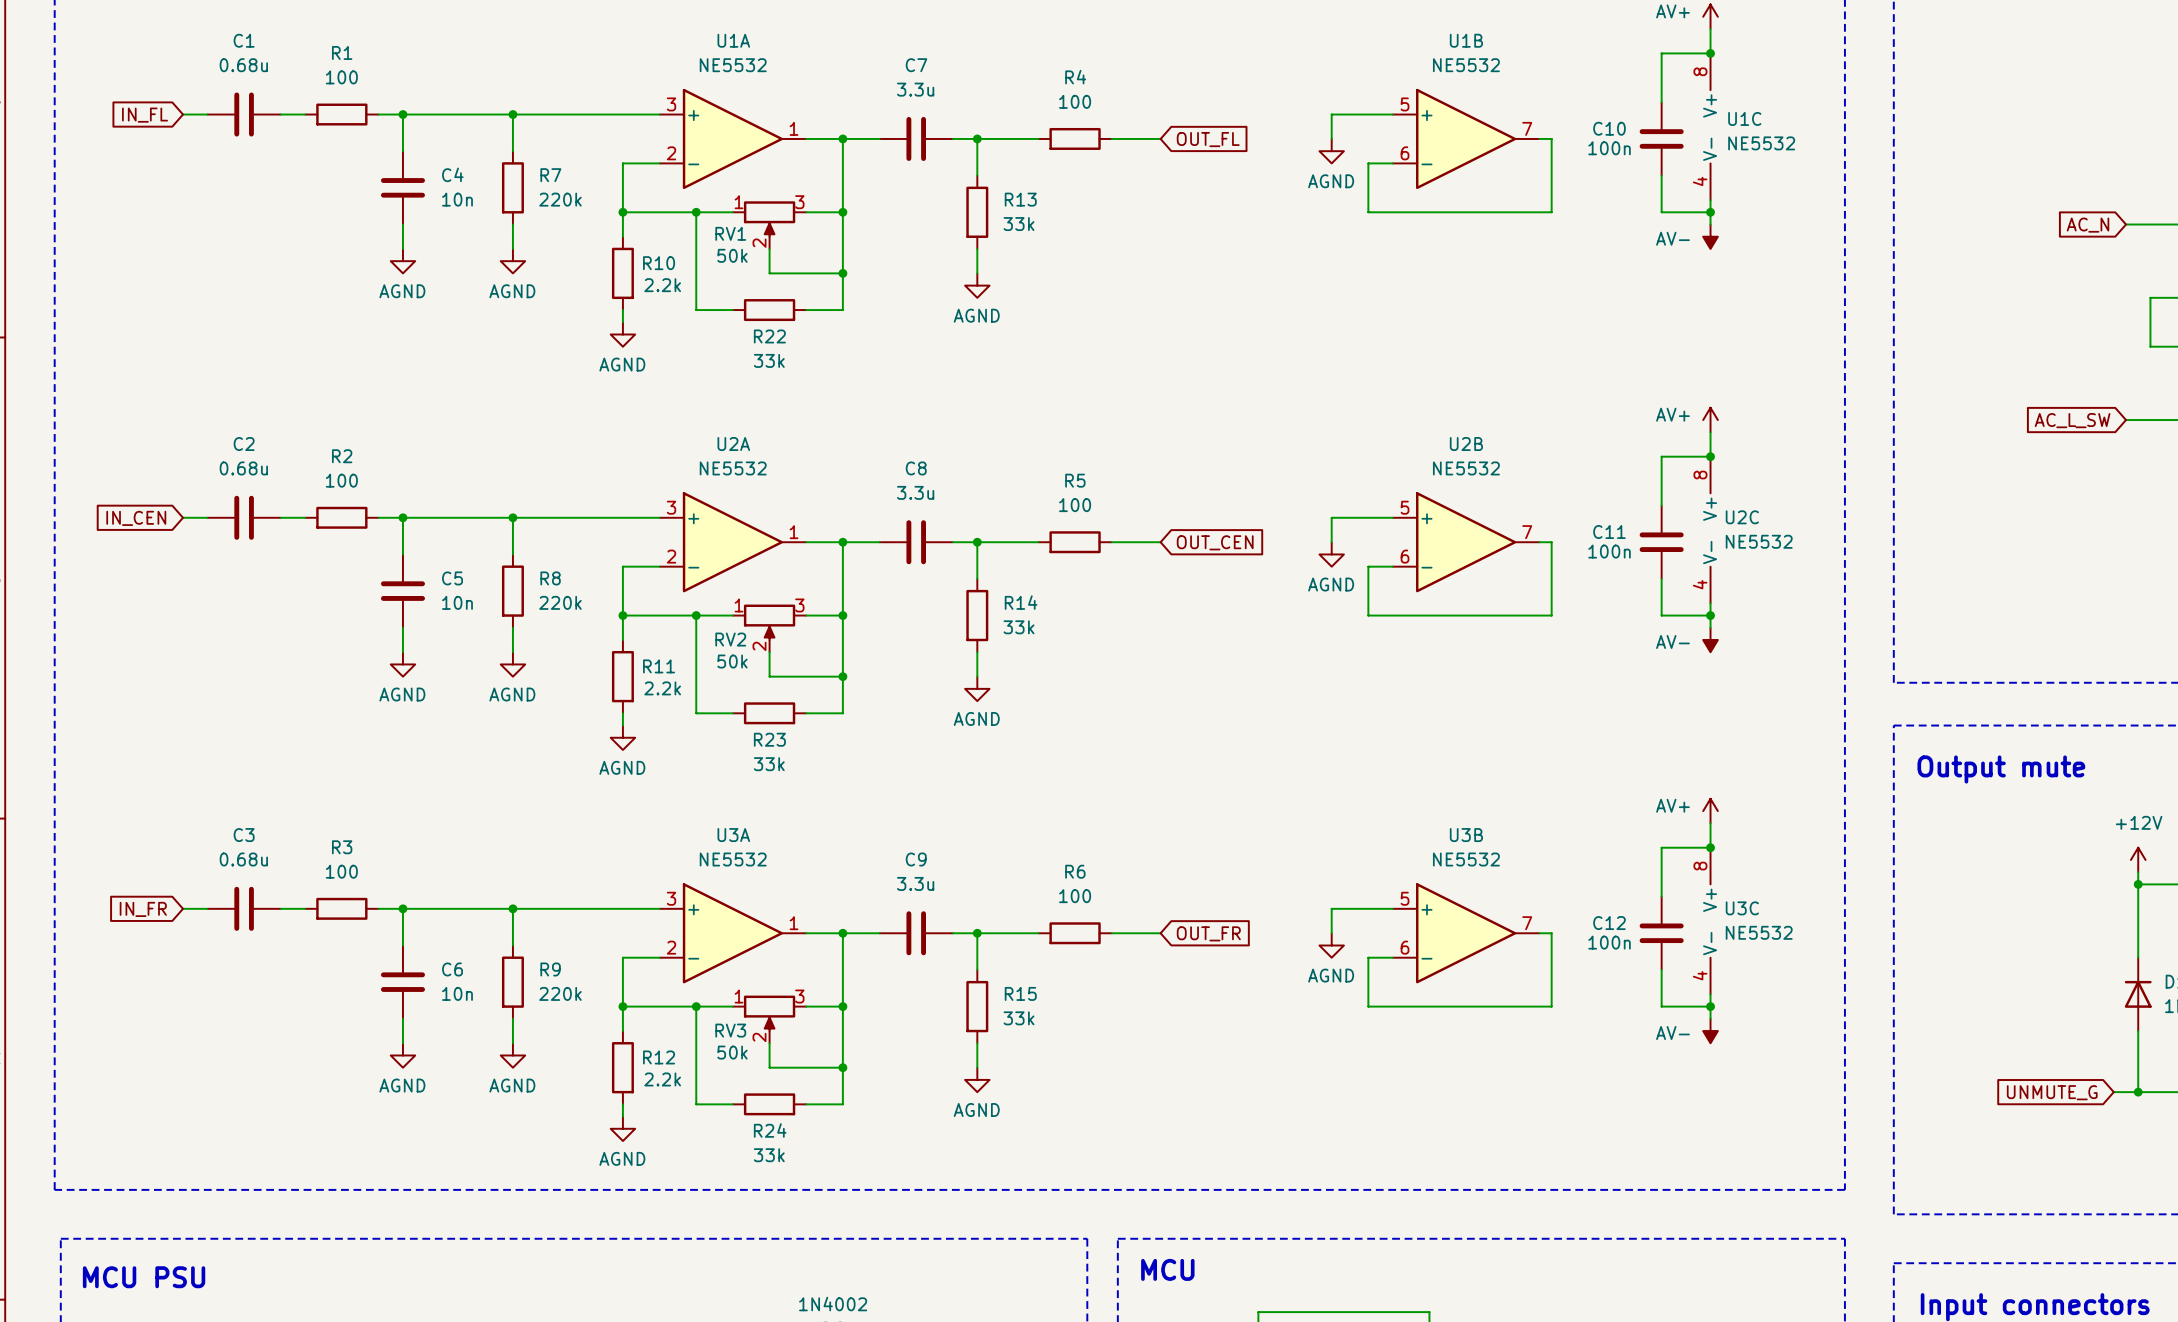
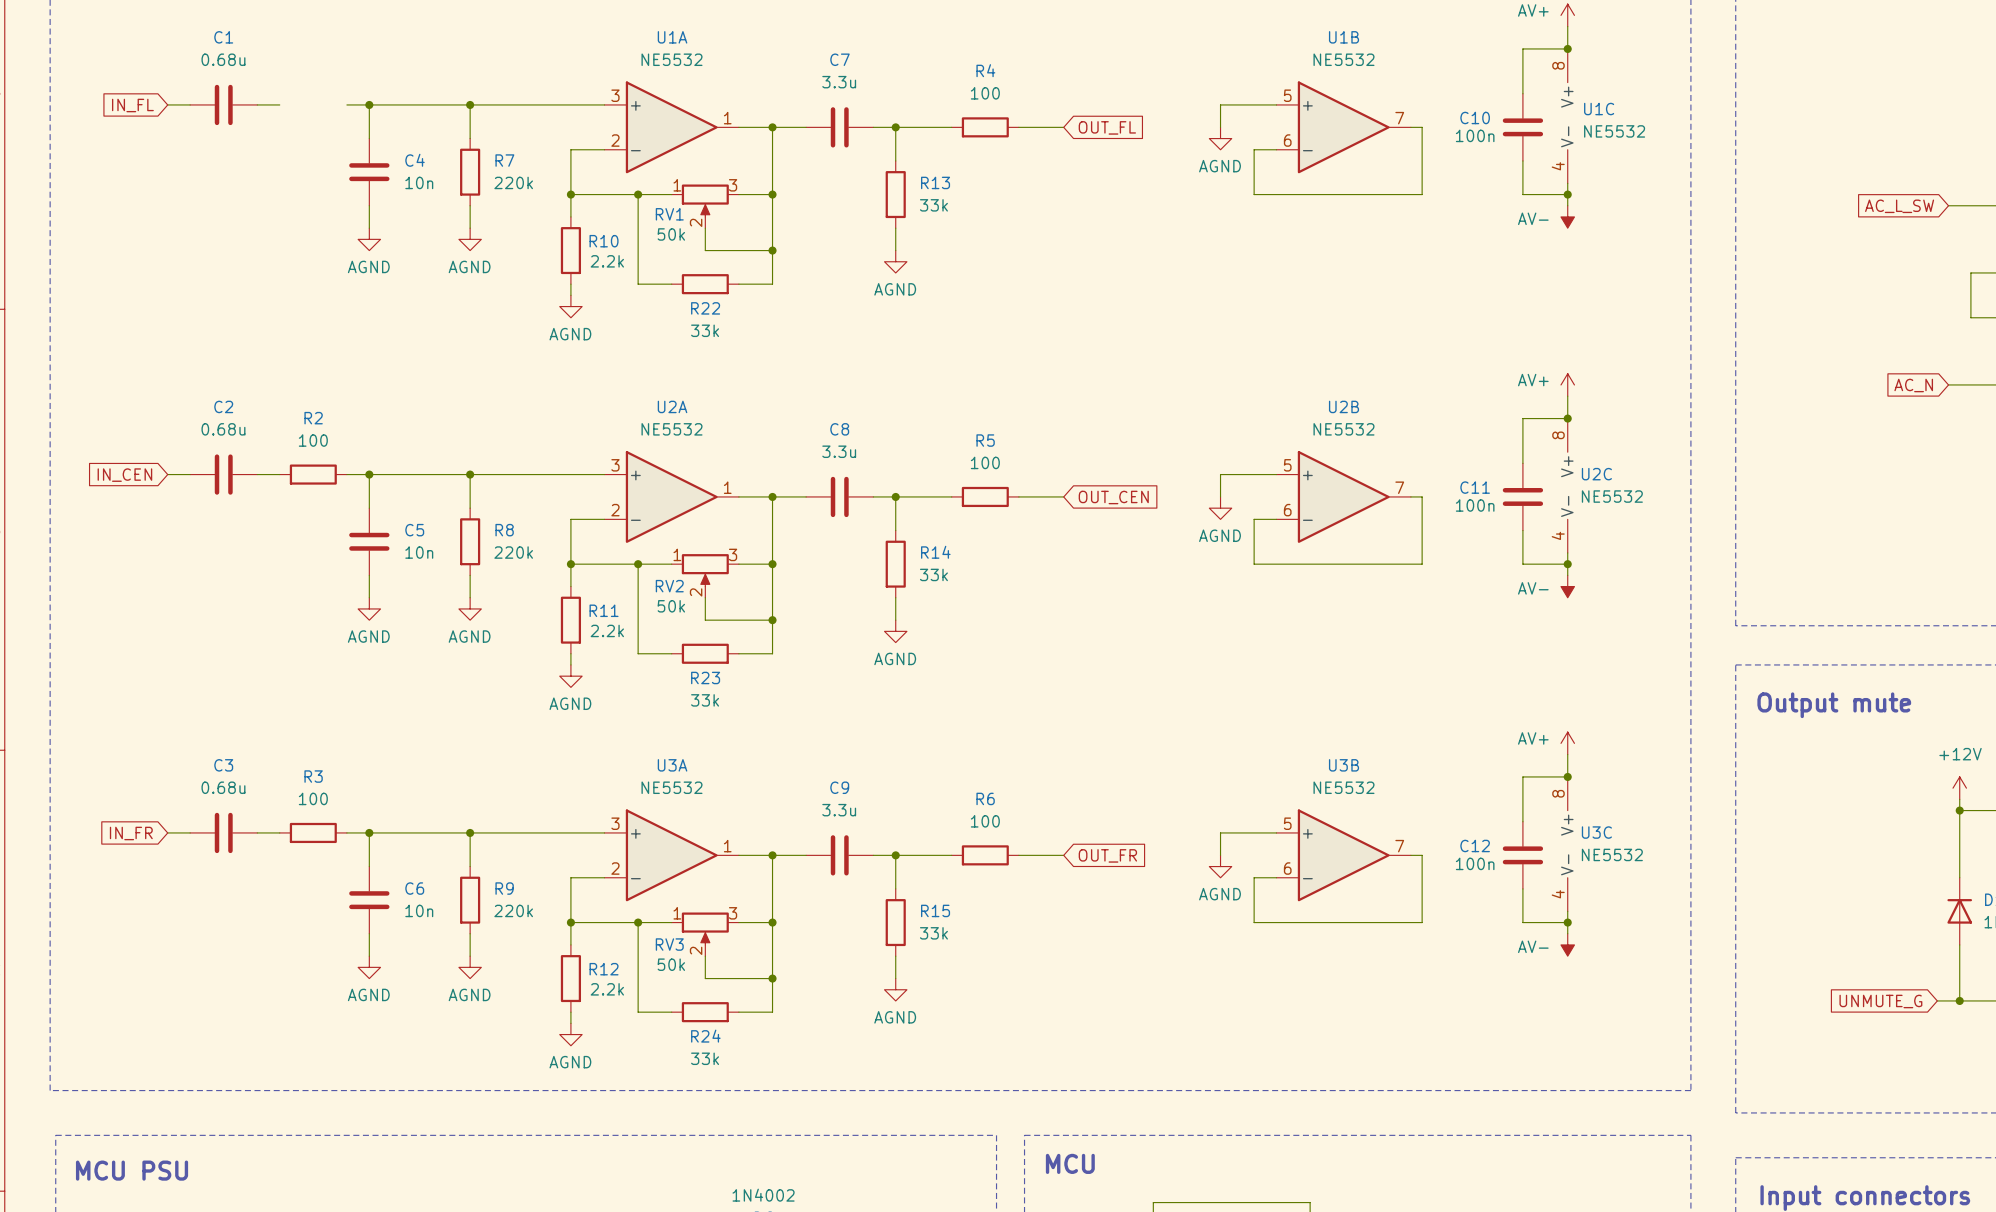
R1: 100 (341, 114) -> none
global label: AC_N (2088, 225) -> AC_L_SW (1899, 206)
global label: AC_L_SW (2072, 420) -> AC_N (1913, 385)

